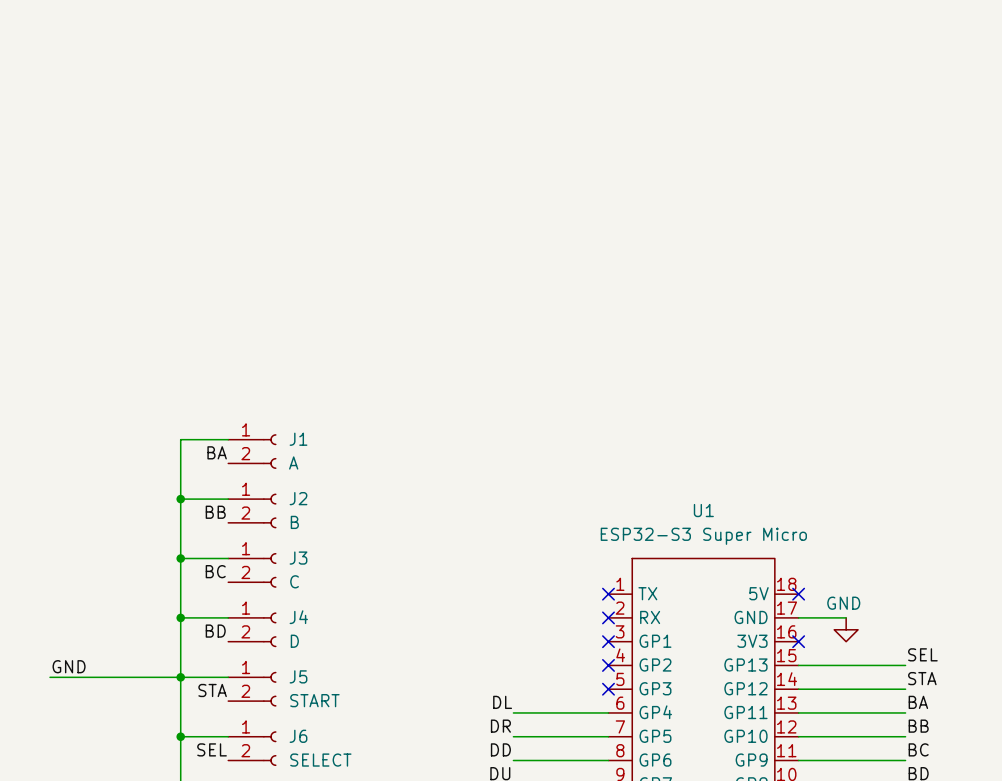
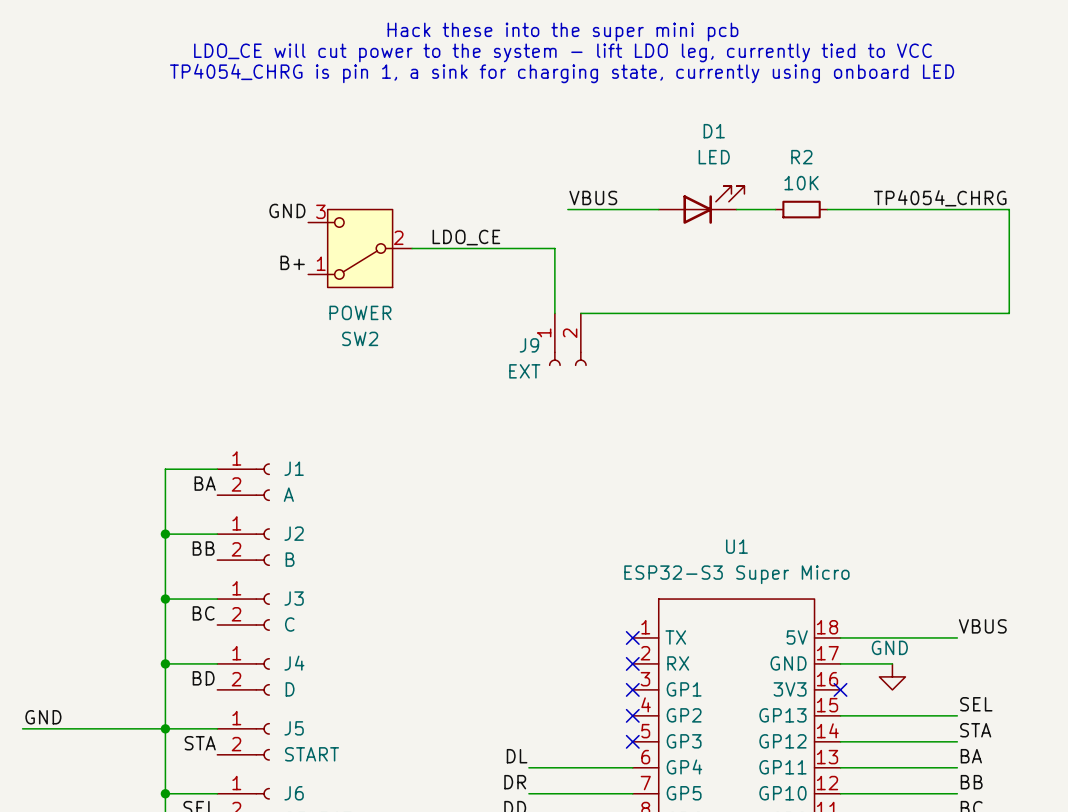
text: none -> Hack these into the super mini pcb (562, 31)
text: none -> LDO_CE will cut power to the system - lift LDO leg, currently tied to VCC (562, 52)
text: none -> TP4054_CHRG is pin 1, a sink for charging state, currently using onboard LED (562, 73)
label: none -> VBUS (593, 197)
label: none -> TP4054_CHRG (940, 198)
D1: none -> LED (701, 205)
wire: none -> (567, 209) (658, 209)
wire: none -> (736, 209) (775, 209)
R2: none -> 10K (801, 209)
wire: none -> (827, 209) (1009, 209) (1009, 313) (580, 313)
label: none -> GND (287, 210)
label: none -> LDO_CE (466, 237)
SW2: none -> POWER (360, 248)
wire: none -> (412, 248) (554, 248) (554, 313)
label: none -> B+ (292, 262)
J9: none -> EXT (567, 339)
label: none -> VBUS (982, 626)
wire: none -> (840, 637) (957, 637)
no-connect mark: (798, 594) -> none

